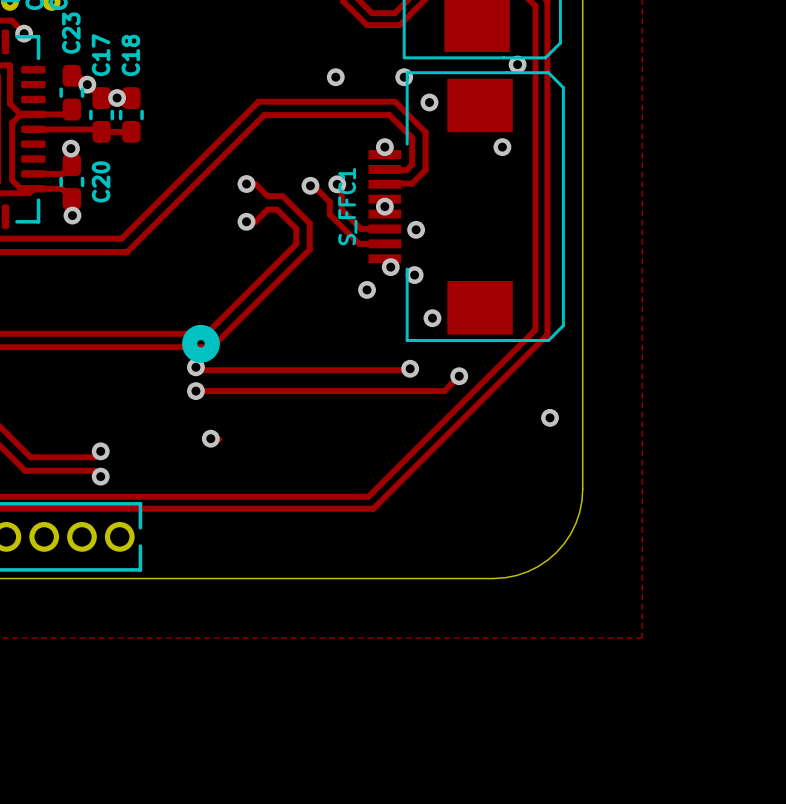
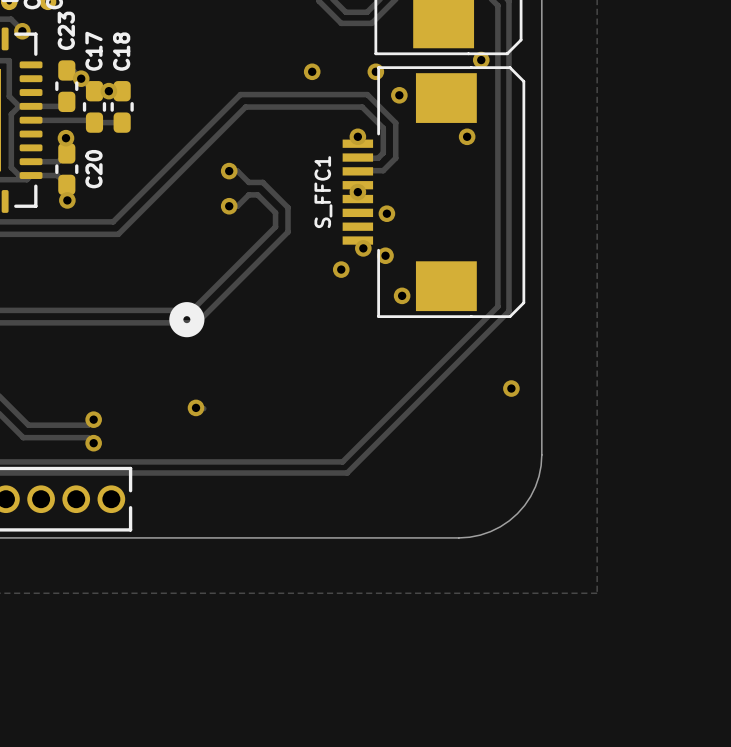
track: (337, 184) (341, 188) (341, 209) (361, 228) (384, 228) -> none
via: (337, 184) -> none
track: (310, 185) (313, 185) (329, 202) (329, 214) (359, 243) (384, 243) -> none
via: (310, 185) -> none
track: (195, 367) (198, 370) (410, 368) -> none
via: (195, 367) -> none
via: (410, 368) -> none
track: (459, 376) (444, 391) (195, 391) -> none
via: (459, 376) -> none
via: (195, 391) -> none

